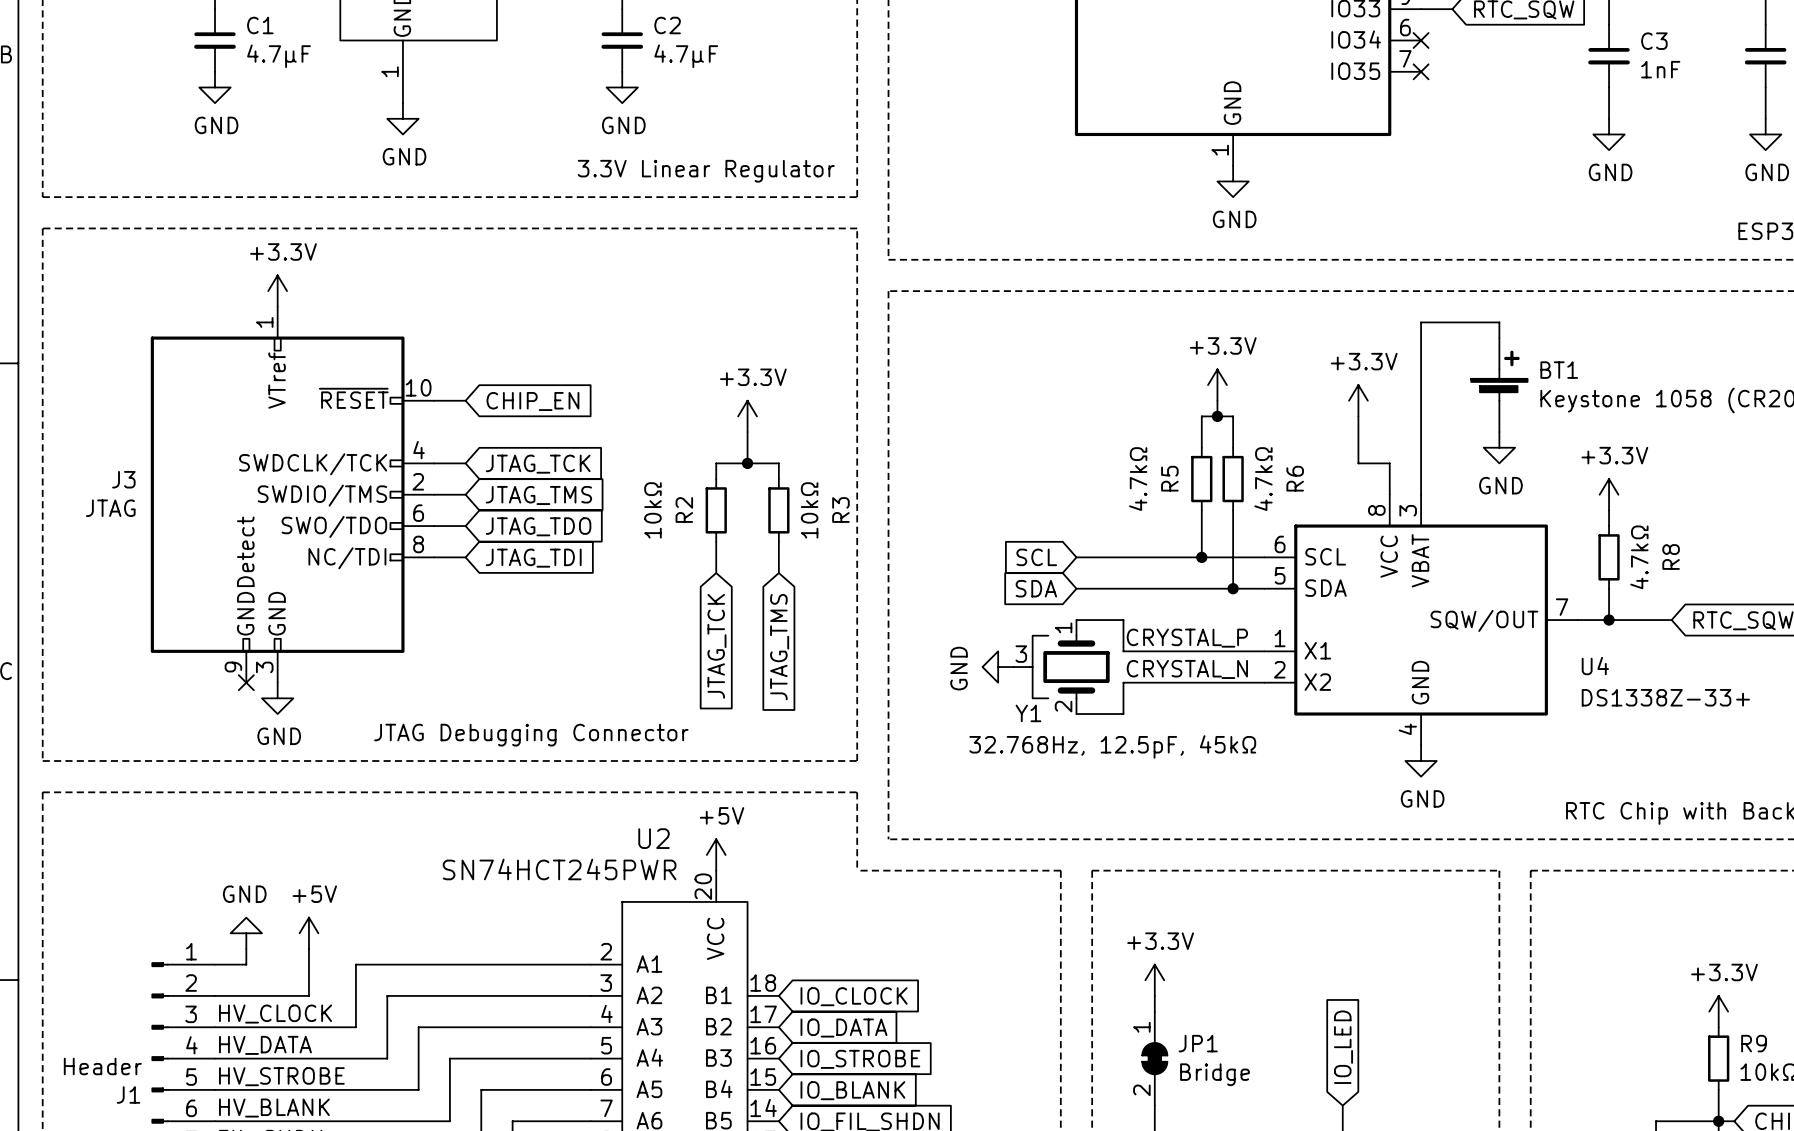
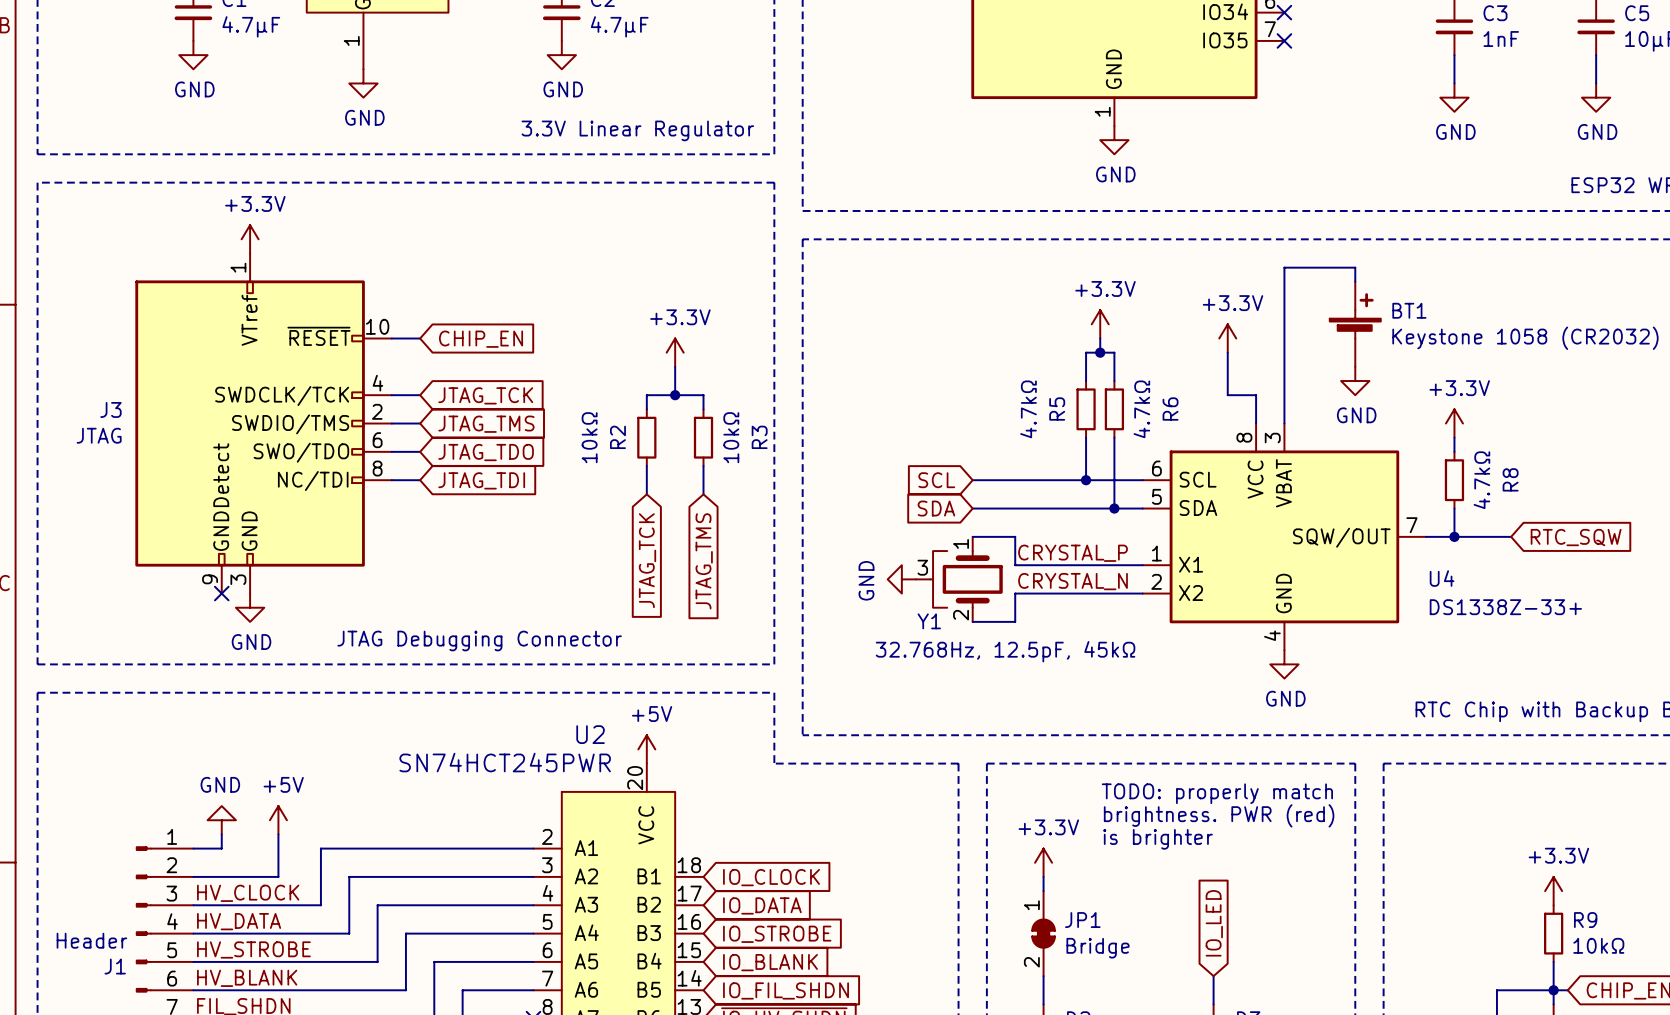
text: none -> TODO: properly match (1217, 793)
text: none -> brightness. PWR (red) (1219, 815)
text: none -> is brighter (1158, 839)

